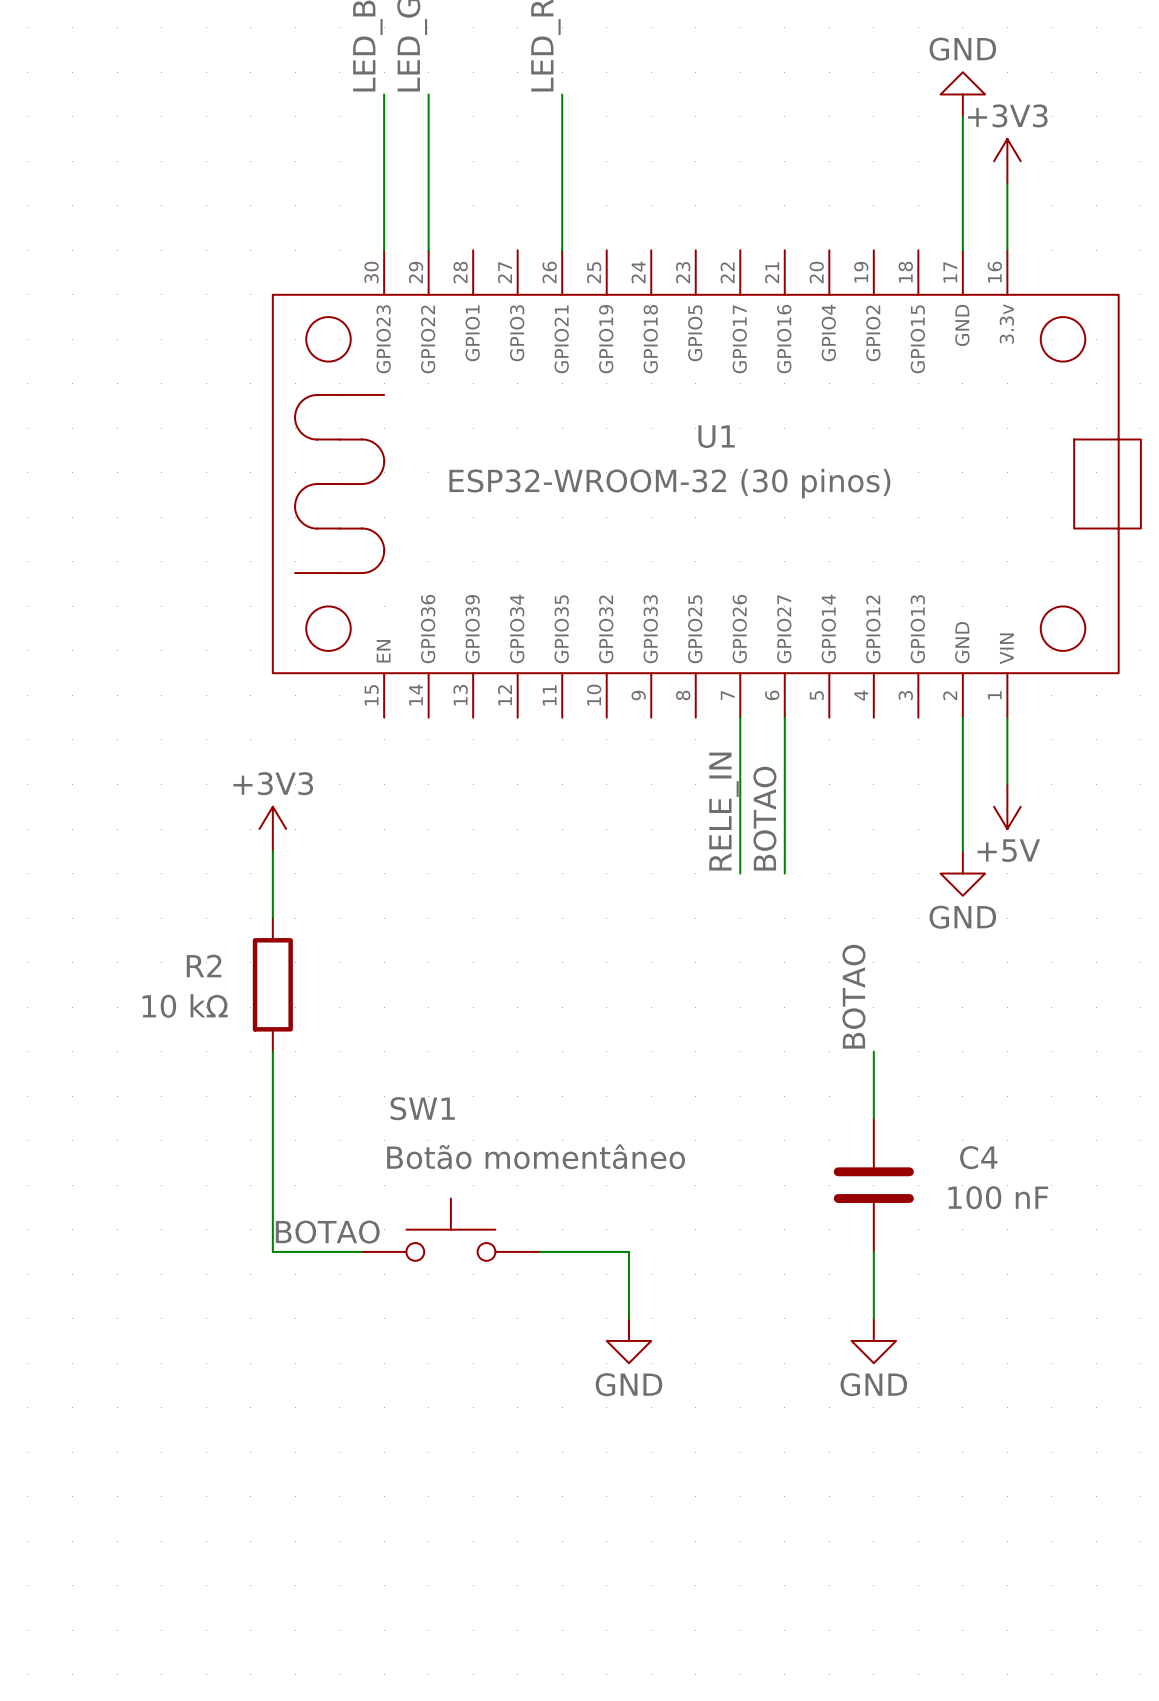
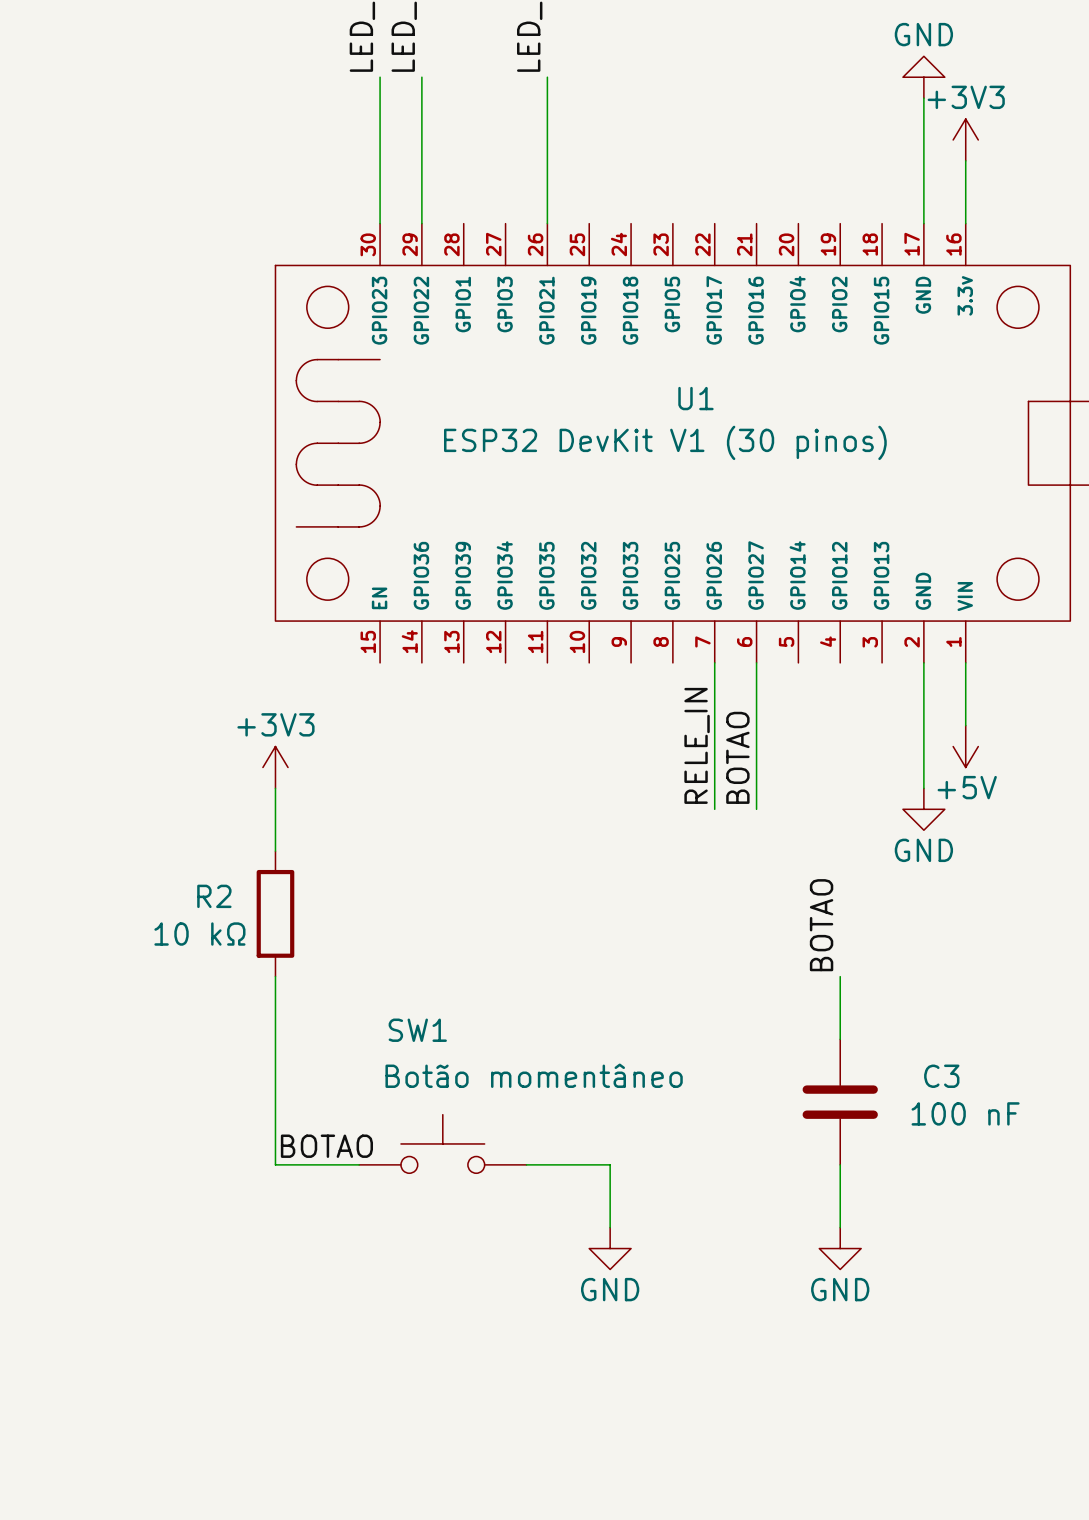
U1 value: ESP32-WROOM-32 (30 pinos) (669, 483) -> ESP32 DevKit V1 (30 pinos) (665, 442)
C4 name: C4 (978, 1157) -> C3 (941, 1076)

